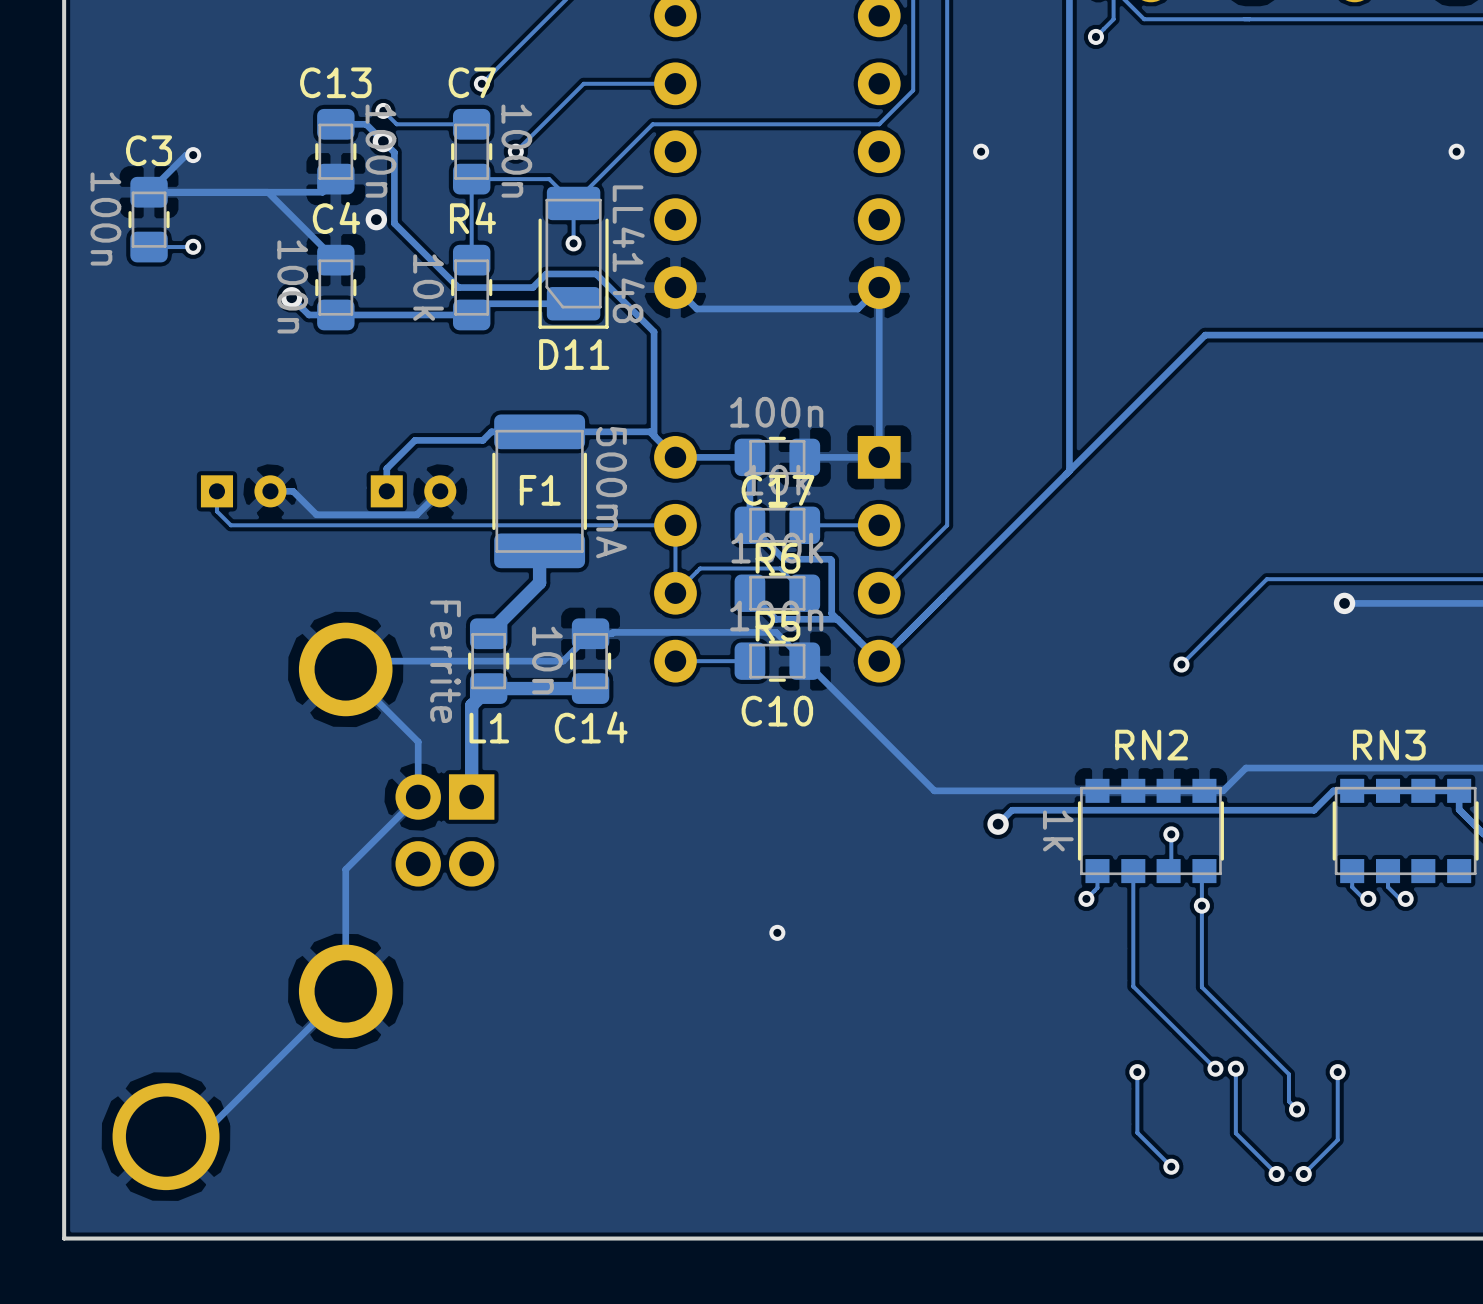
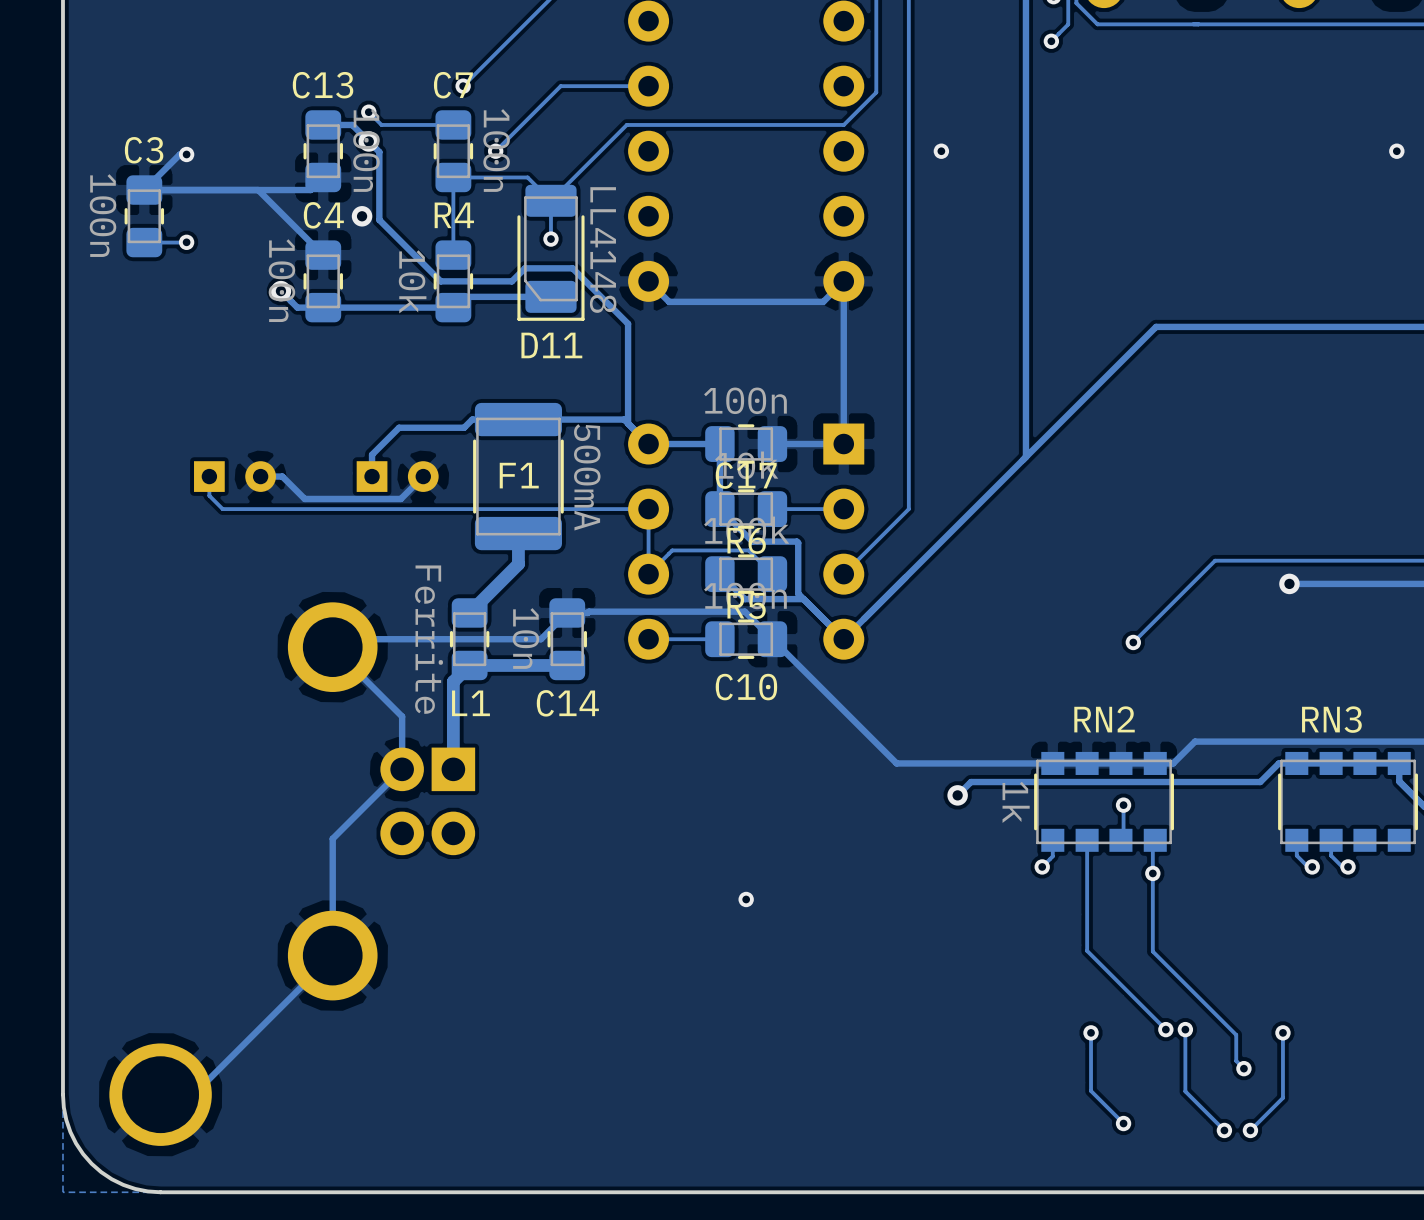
board edge: (64, 1136) (64, 1238) (166, 1238) -> (62, 1094) (63, 1107) (70, 1132) (76, 1143) (91, 1163) (111, 1179) (123, 1184) (147, 1191) (160, 1192)

